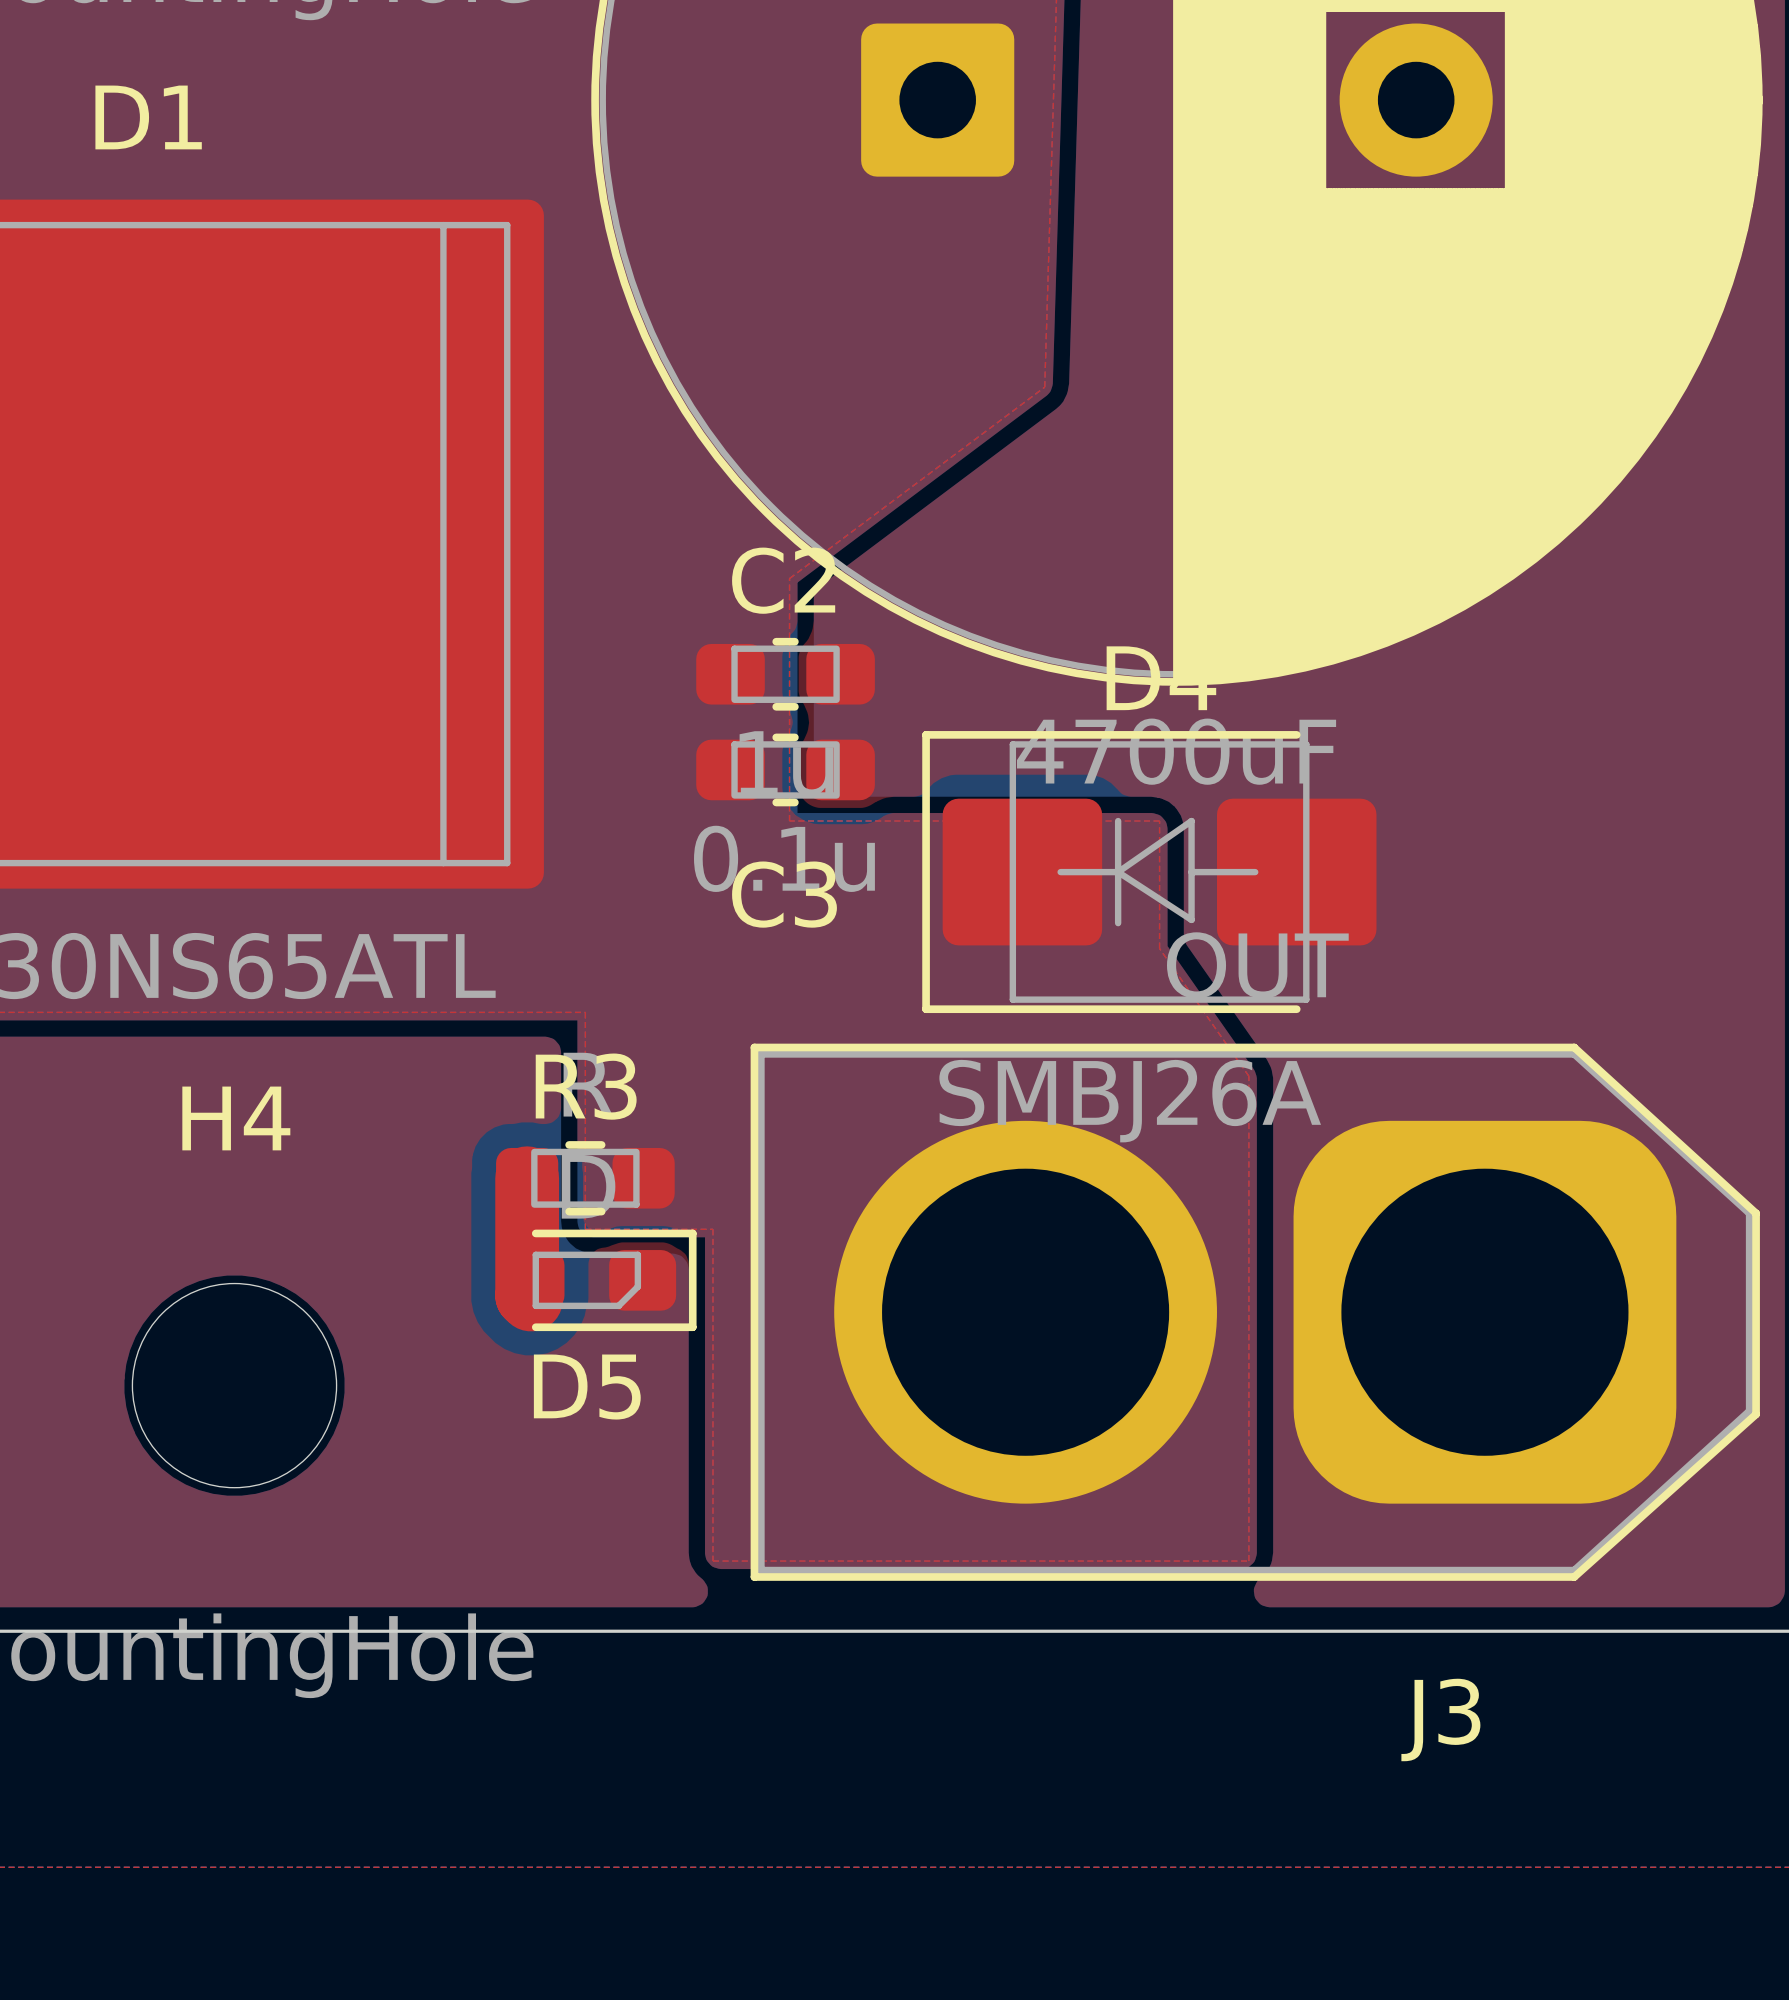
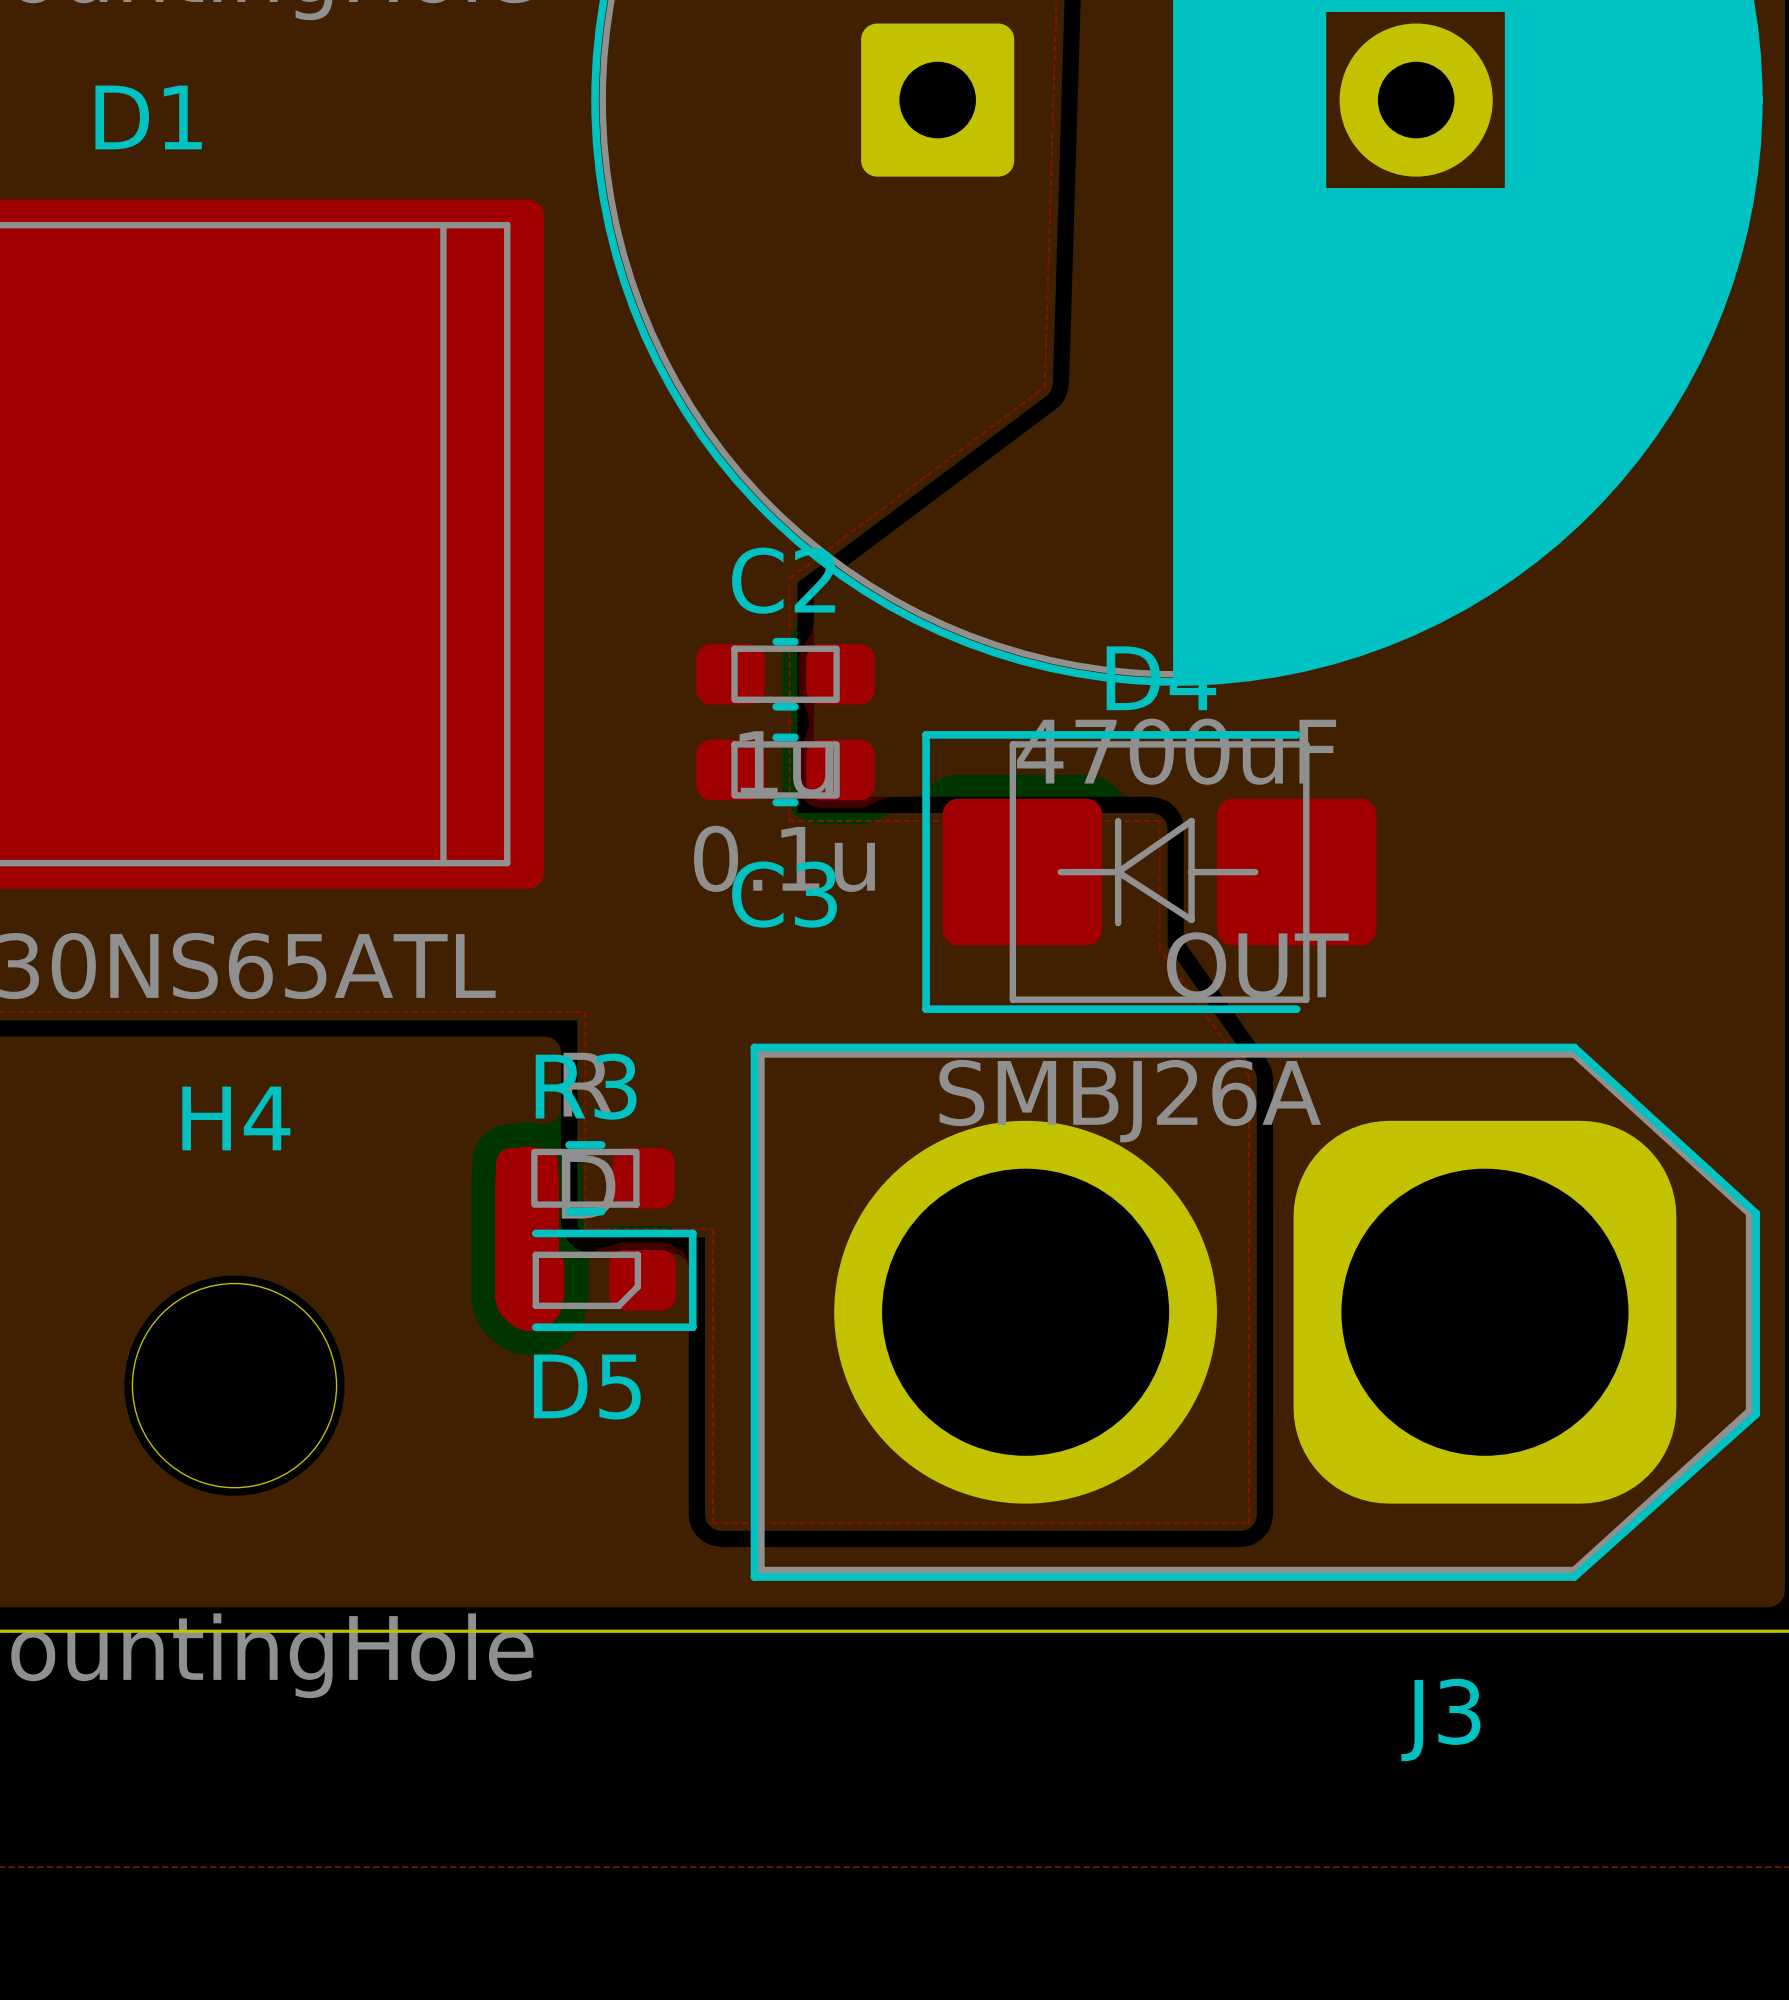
top zone outline: (712, 1522) (712, 1561) (1248, 1561) (1248, 1522) -> (712, 1522) (1248, 1522)

